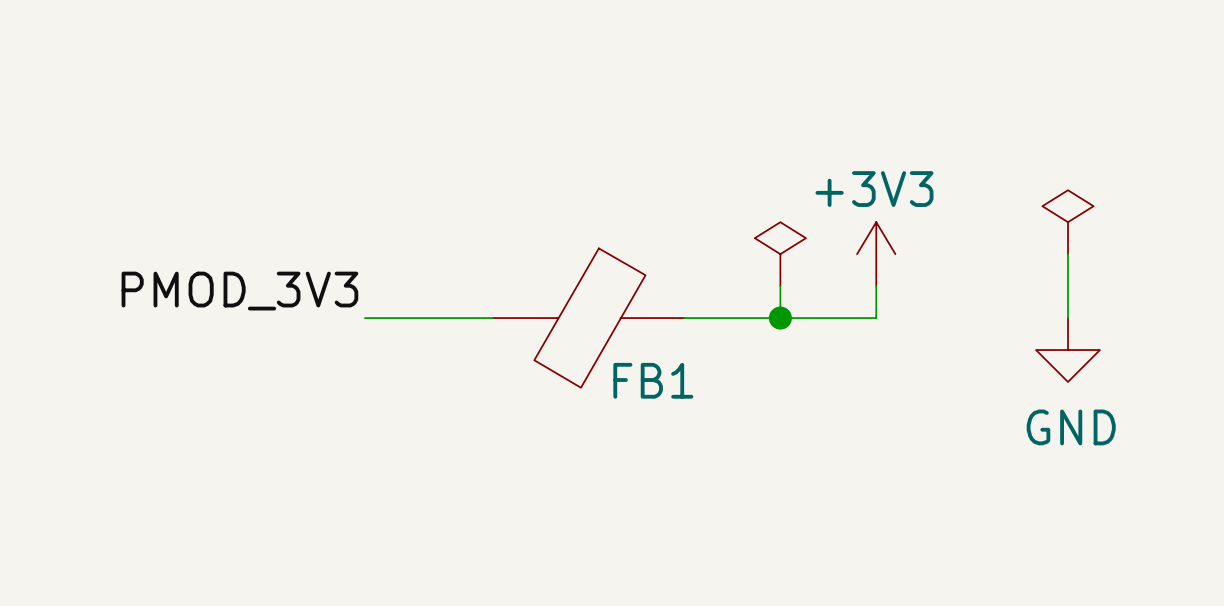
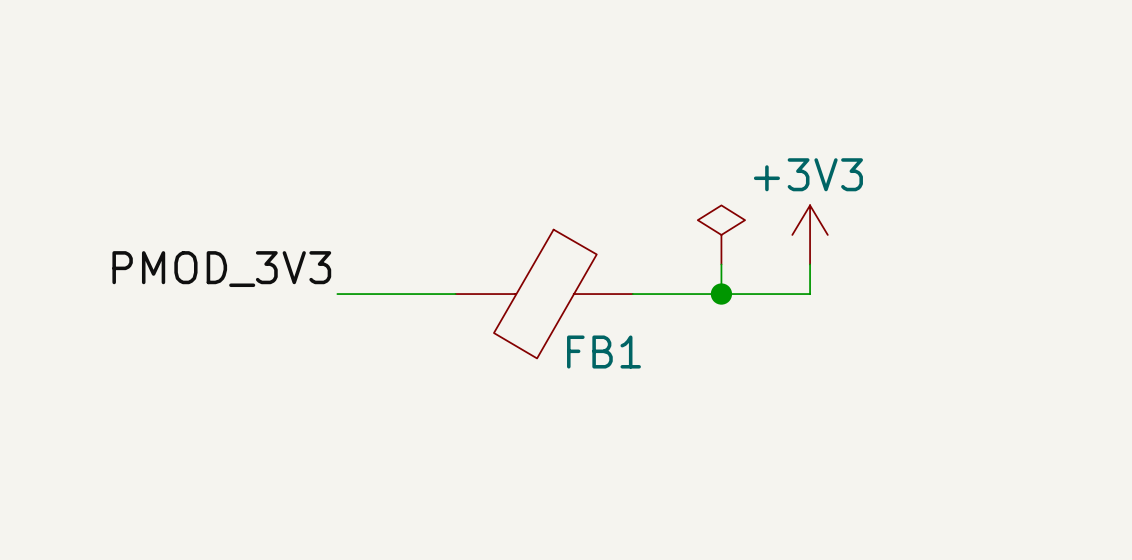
power symbol: (1067, 222) -> none
wire: (1067, 254) (1067, 318) -> none
power symbol: GND (1067, 350) -> none

